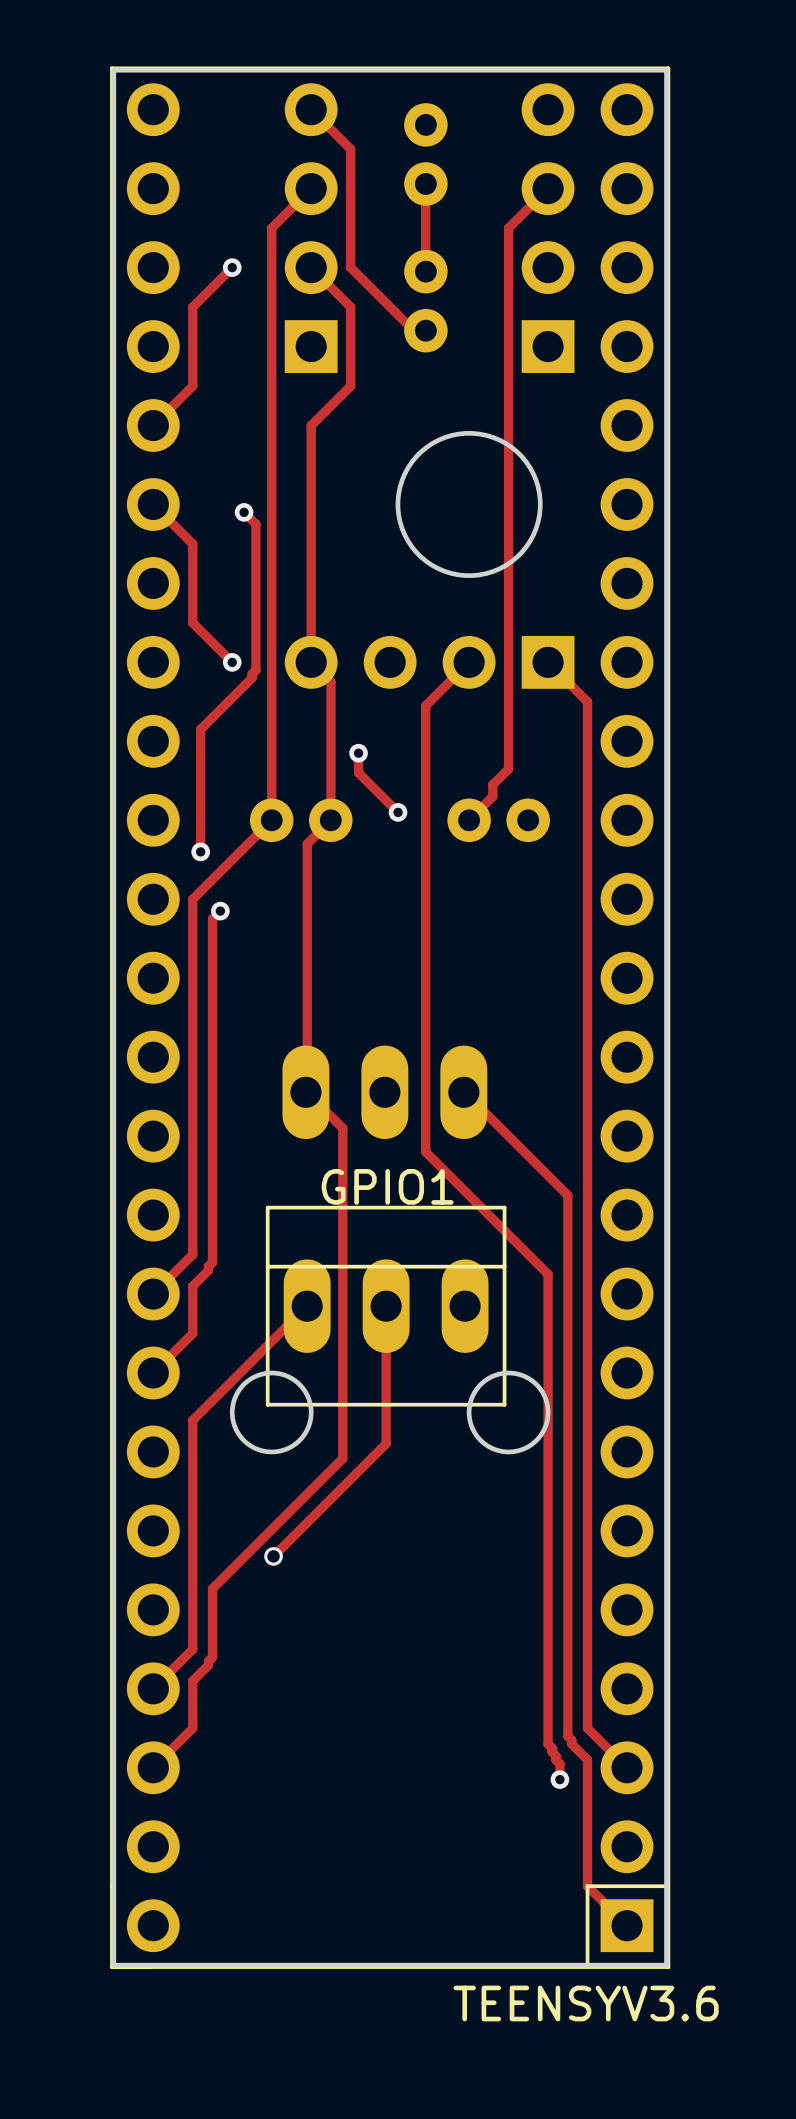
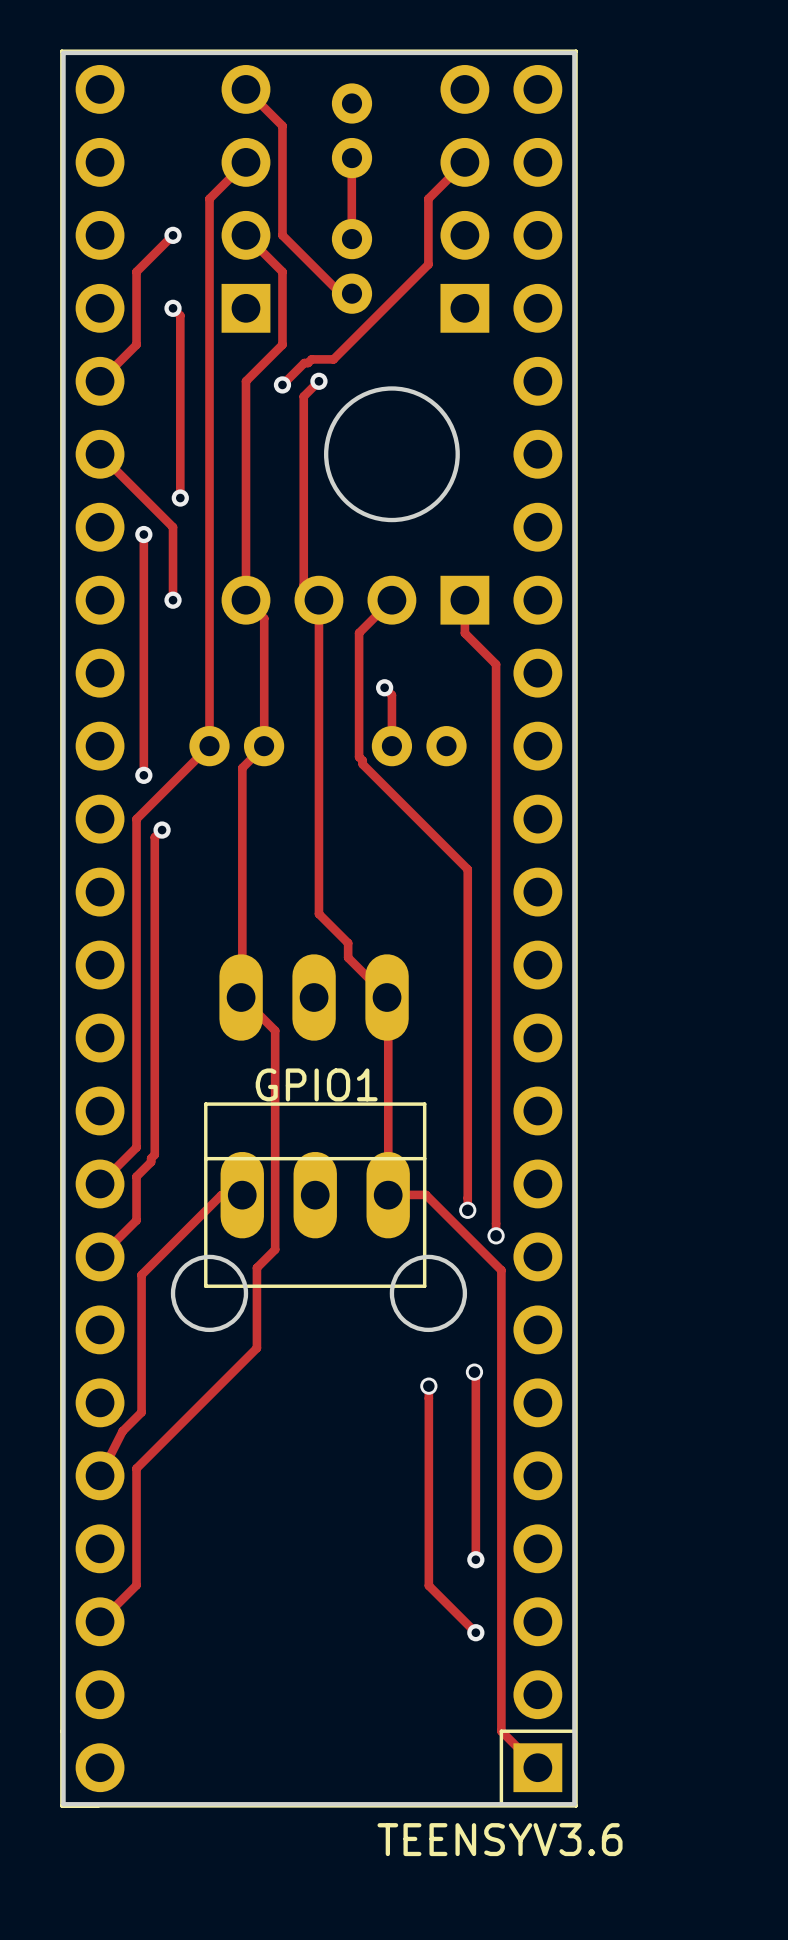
track: (508, 299) (508, 768) (492, 784) (492, 796) (469, 820) -> (428, 264) (333, 359) (311, 359) (308, 363) (304, 363) (282, 384)
track: none -> (173, 308) (180, 315) (180, 498)
via: none -> (173, 308)
track: none -> (318, 381) (303, 396) (303, 584) (318, 600) (318, 913) (348, 943) (348, 957) (388, 997) (388, 1194) (425, 1194) (501, 1270)
via: none -> (318, 381)
via: none -> (282, 384)
track: (244, 512) (255, 524) (255, 670) (251, 674) (251, 678) (200, 729) -> (143, 534) (143, 662)
via position: (244, 512) -> (180, 498)
track: (192, 543) (192, 622) (232, 662) -> (136, 490) (173, 527) (173, 600)
via: none -> (143, 534)
track: (548, 662) (587, 701) (587, 1387) -> (464, 600) (464, 633) (496, 664) (496, 1235)
track: (433, 697) (425, 705) (425, 1151) (548, 1274) (548, 1744) (559, 1763) (559, 1779) -> (359, 633) (359, 757) (362, 760) (362, 764) (467, 869) (467, 1210)
track: (358, 753) (358, 772) (398, 812) -> none
via: (358, 753) -> none
track: none -> (384, 687) (391, 695) (391, 746)
via: none -> (384, 687)
via: (398, 812) -> none
track: (465, 1092) (567, 1195) (567, 1736) (571, 1740) (571, 1744) (587, 1759) -> none
track: (307, 1305) (192, 1420) (192, 1601) -> (242, 1195) (221, 1195) (141, 1274) (141, 1412) (122, 1431) (100, 1475)
track: (386, 1306) (386, 1443) (273, 1556) -> none
via: none -> (467, 1210)
via: none -> (496, 1235)
track: (342, 1365) (342, 1458) (212, 1588) (212, 1657) (208, 1661) (208, 1665) (192, 1680) -> (275, 1249) (256, 1267) (256, 1348) (136, 1468)
track: none -> (474, 1372) (475, 1559)
via: none -> (474, 1372)
track: none -> (428, 1386) (428, 1585) (475, 1632)
via: none -> (428, 1386)
via: (273, 1556) -> none
track: (192, 1649) (153, 1688) -> (136, 1512) (136, 1541)
via: none -> (475, 1559)
track: (587, 1728) (627, 1767) -> (501, 1585) (501, 1614)

